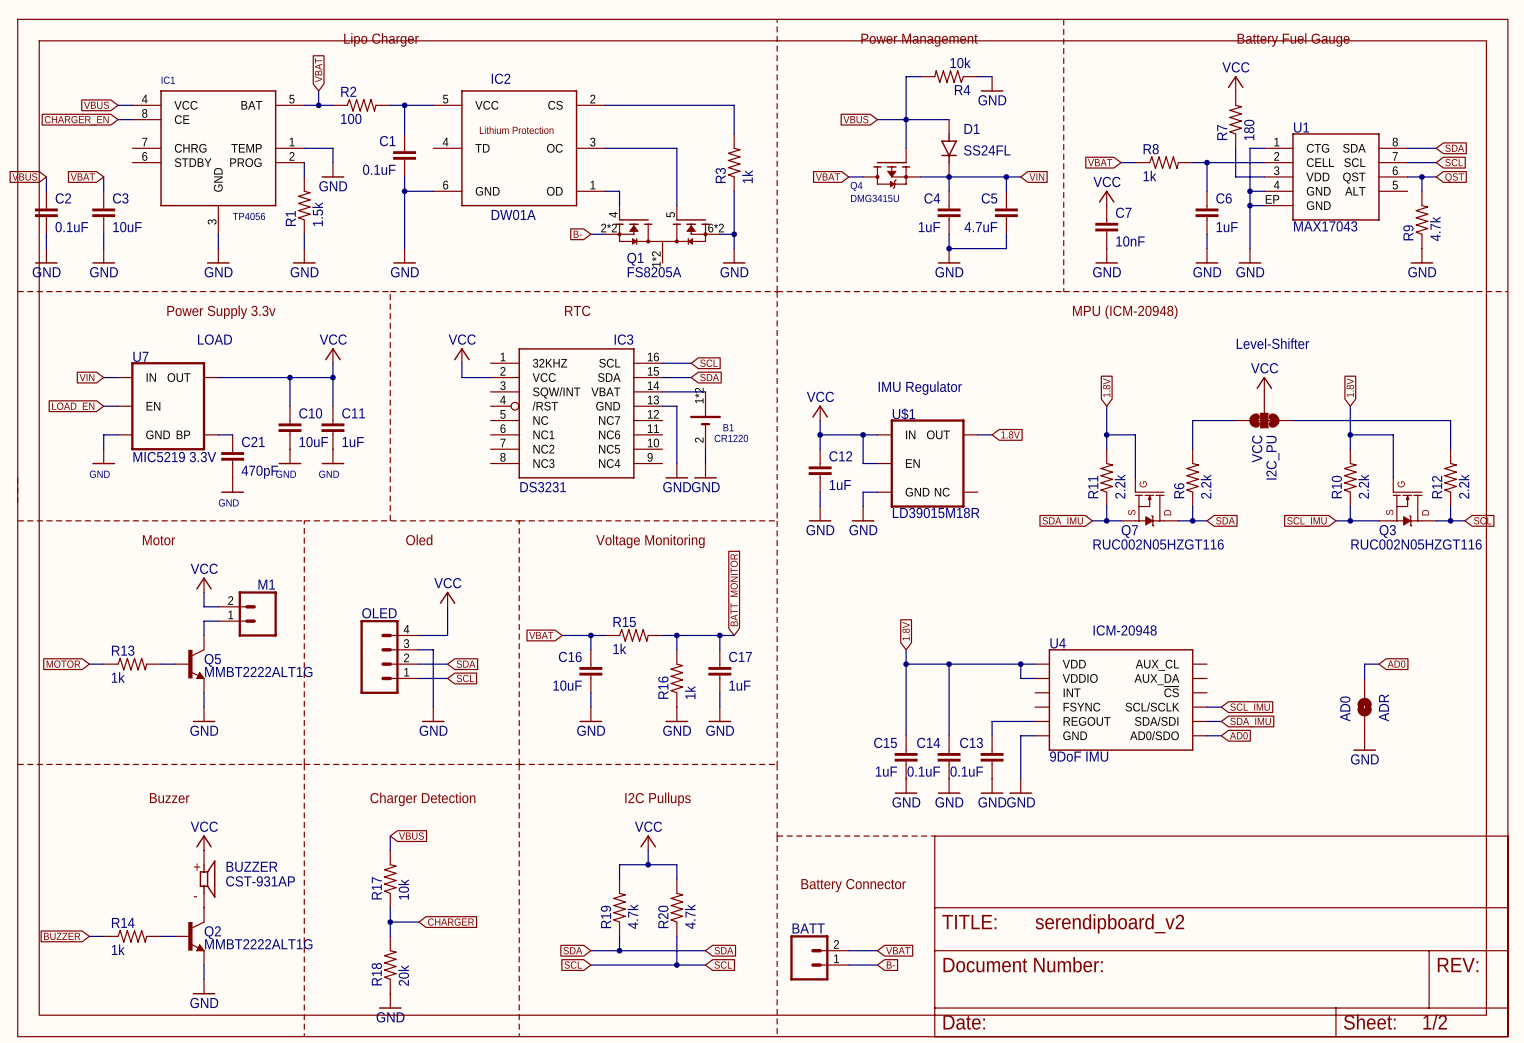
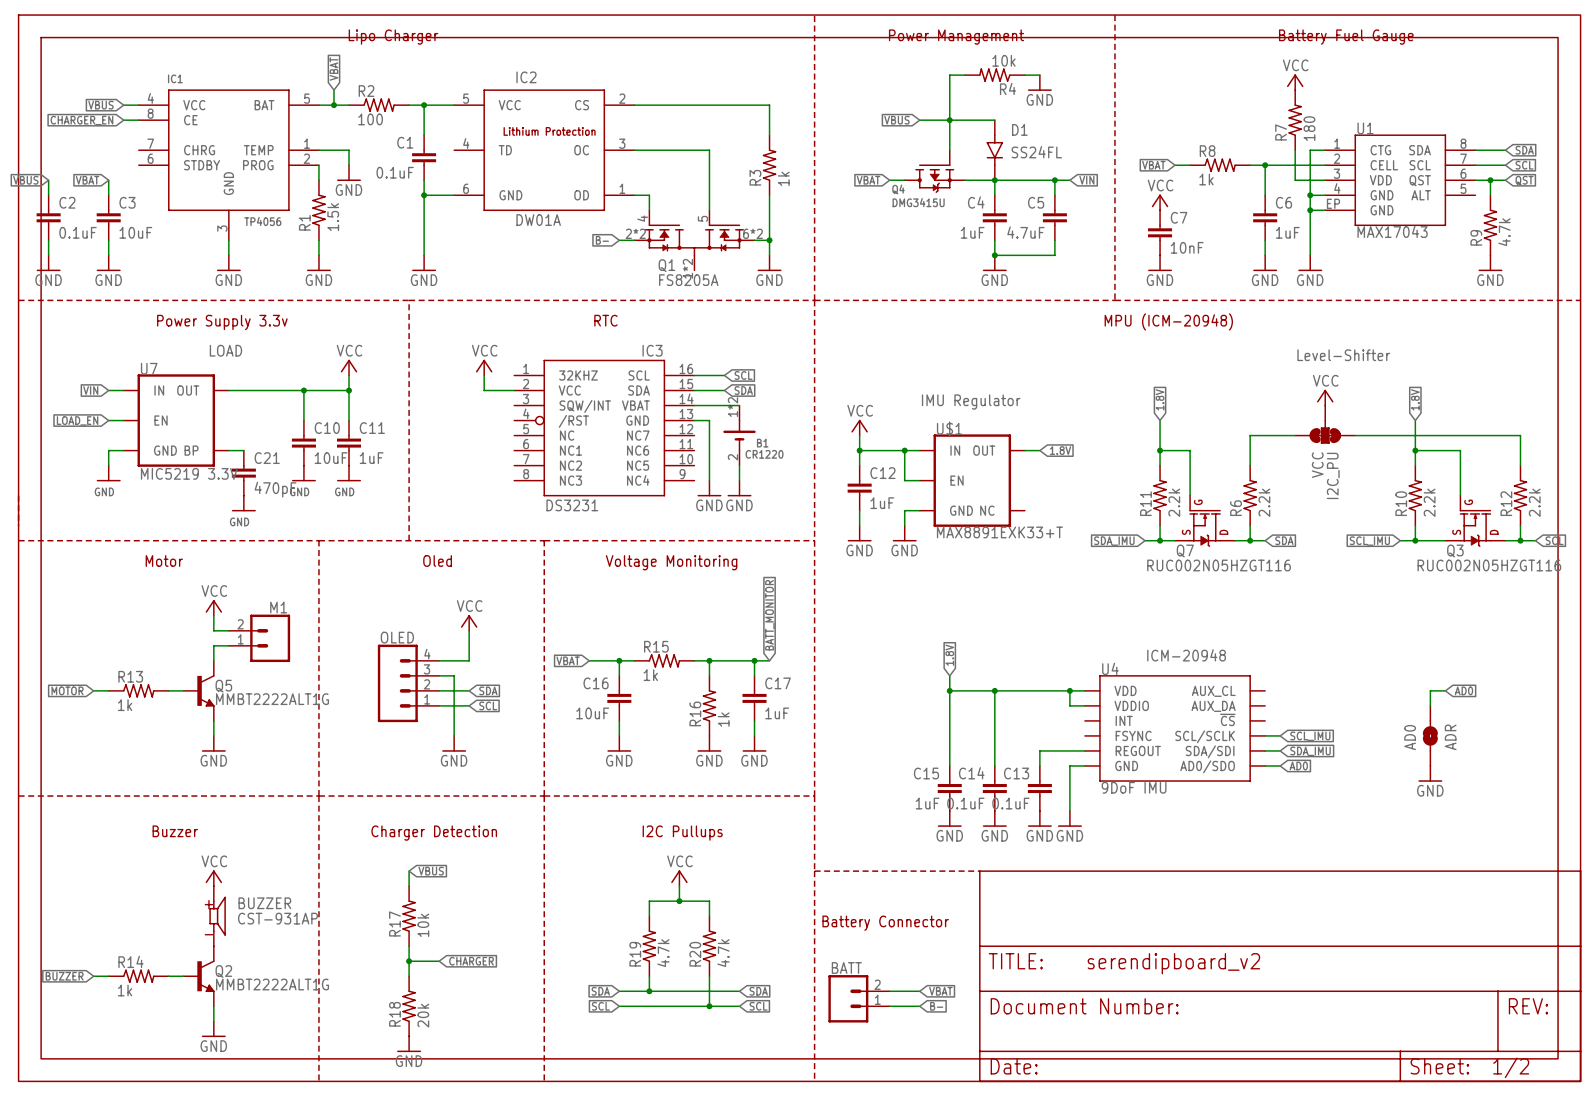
U$1 value: LD39015M18R (936, 512) -> MAX8891EXK33+T (999, 532)

